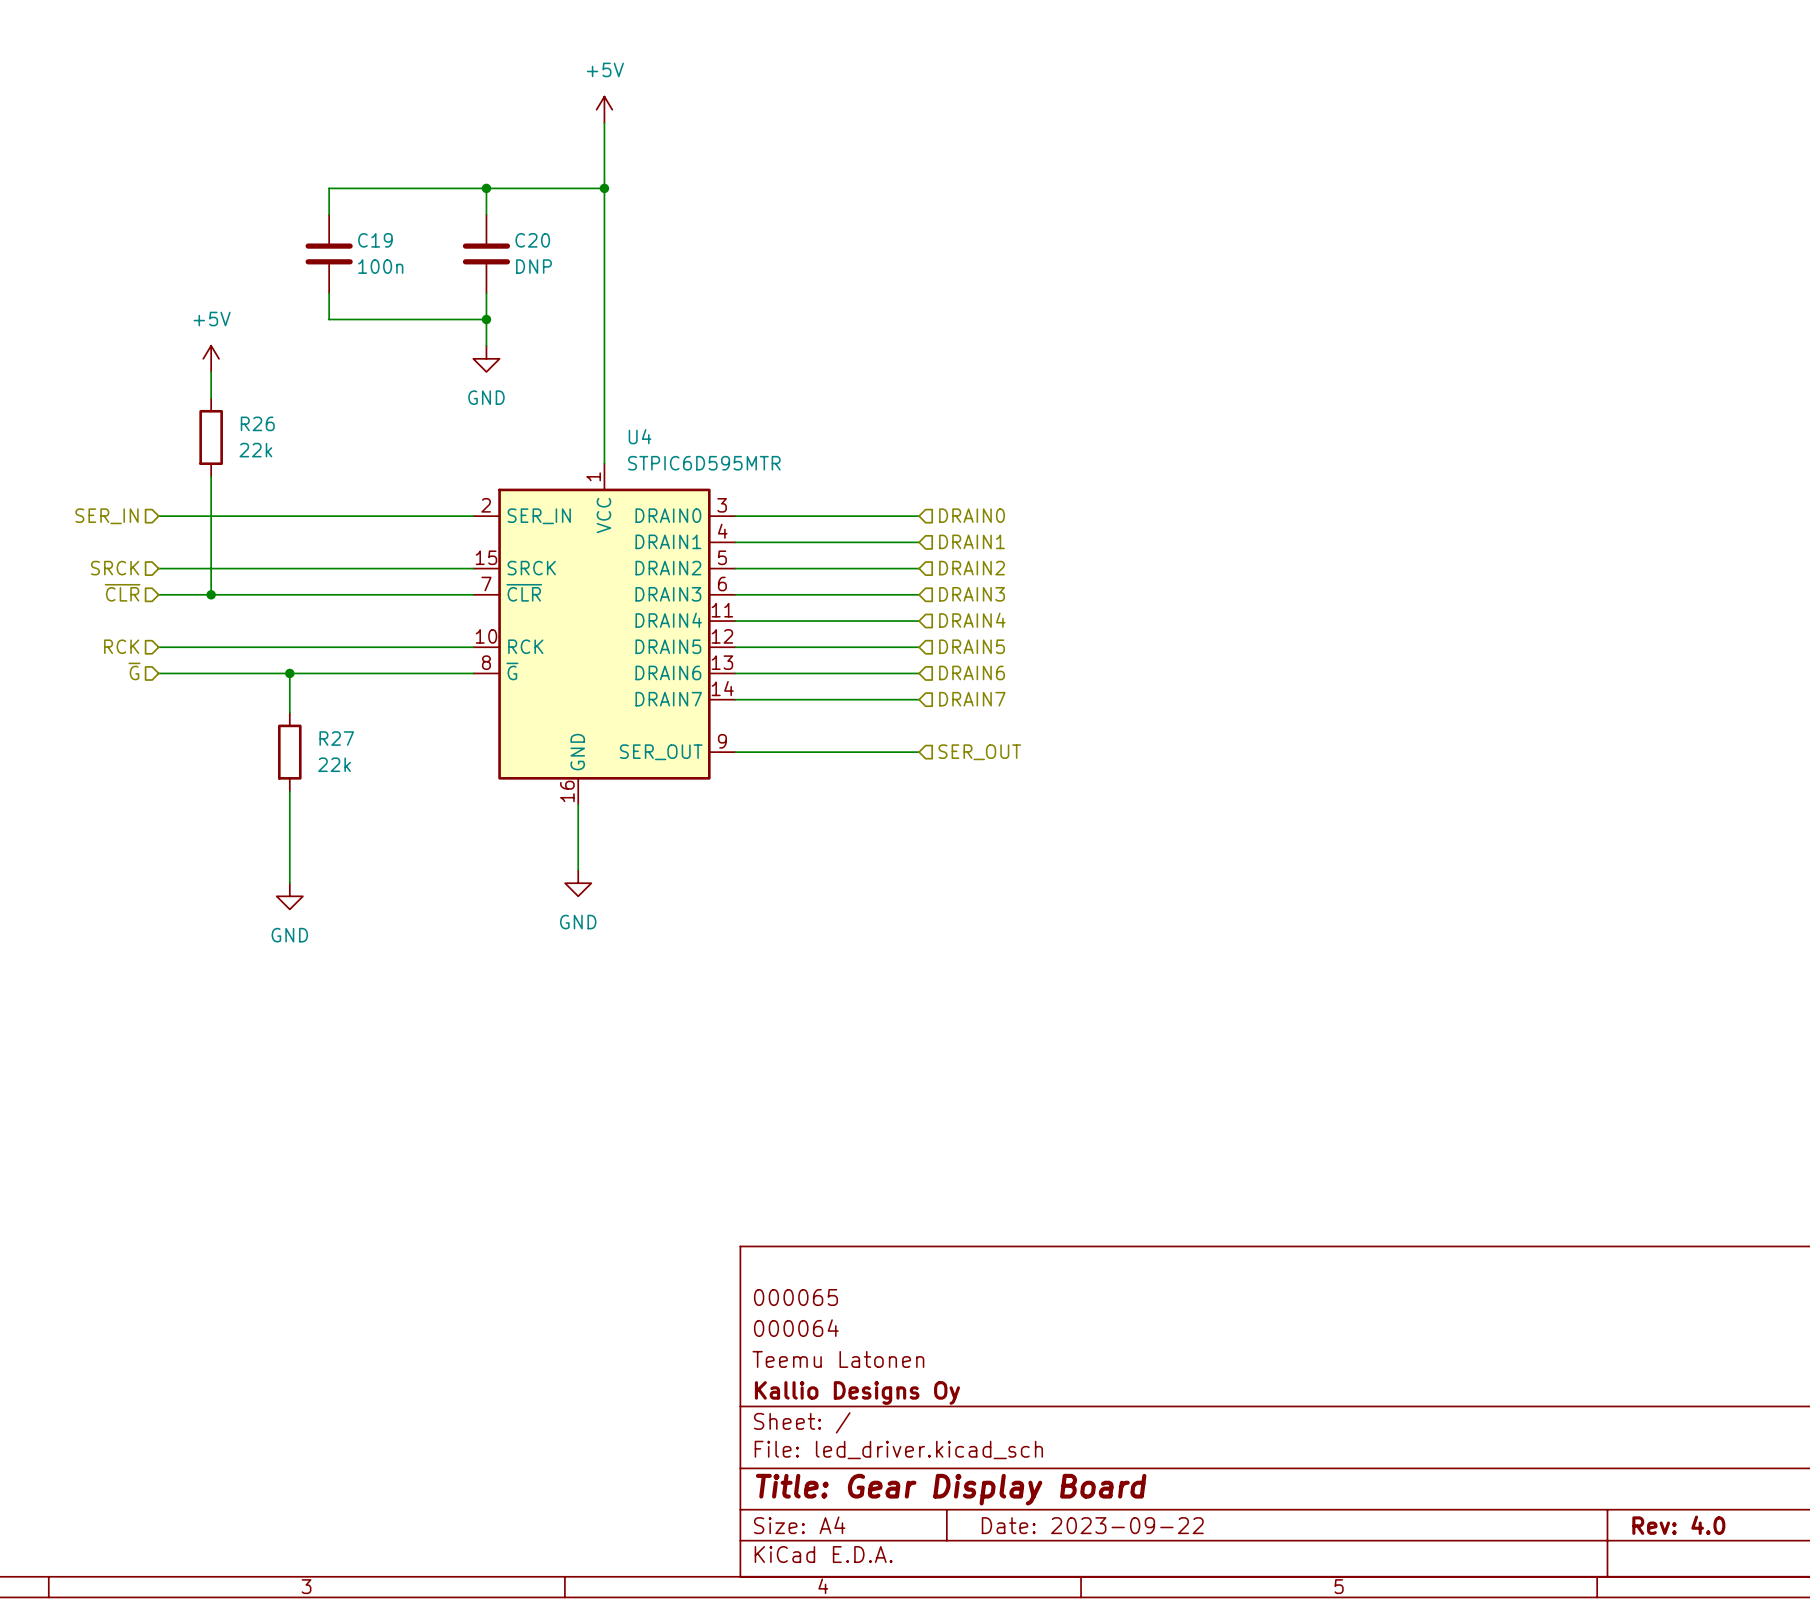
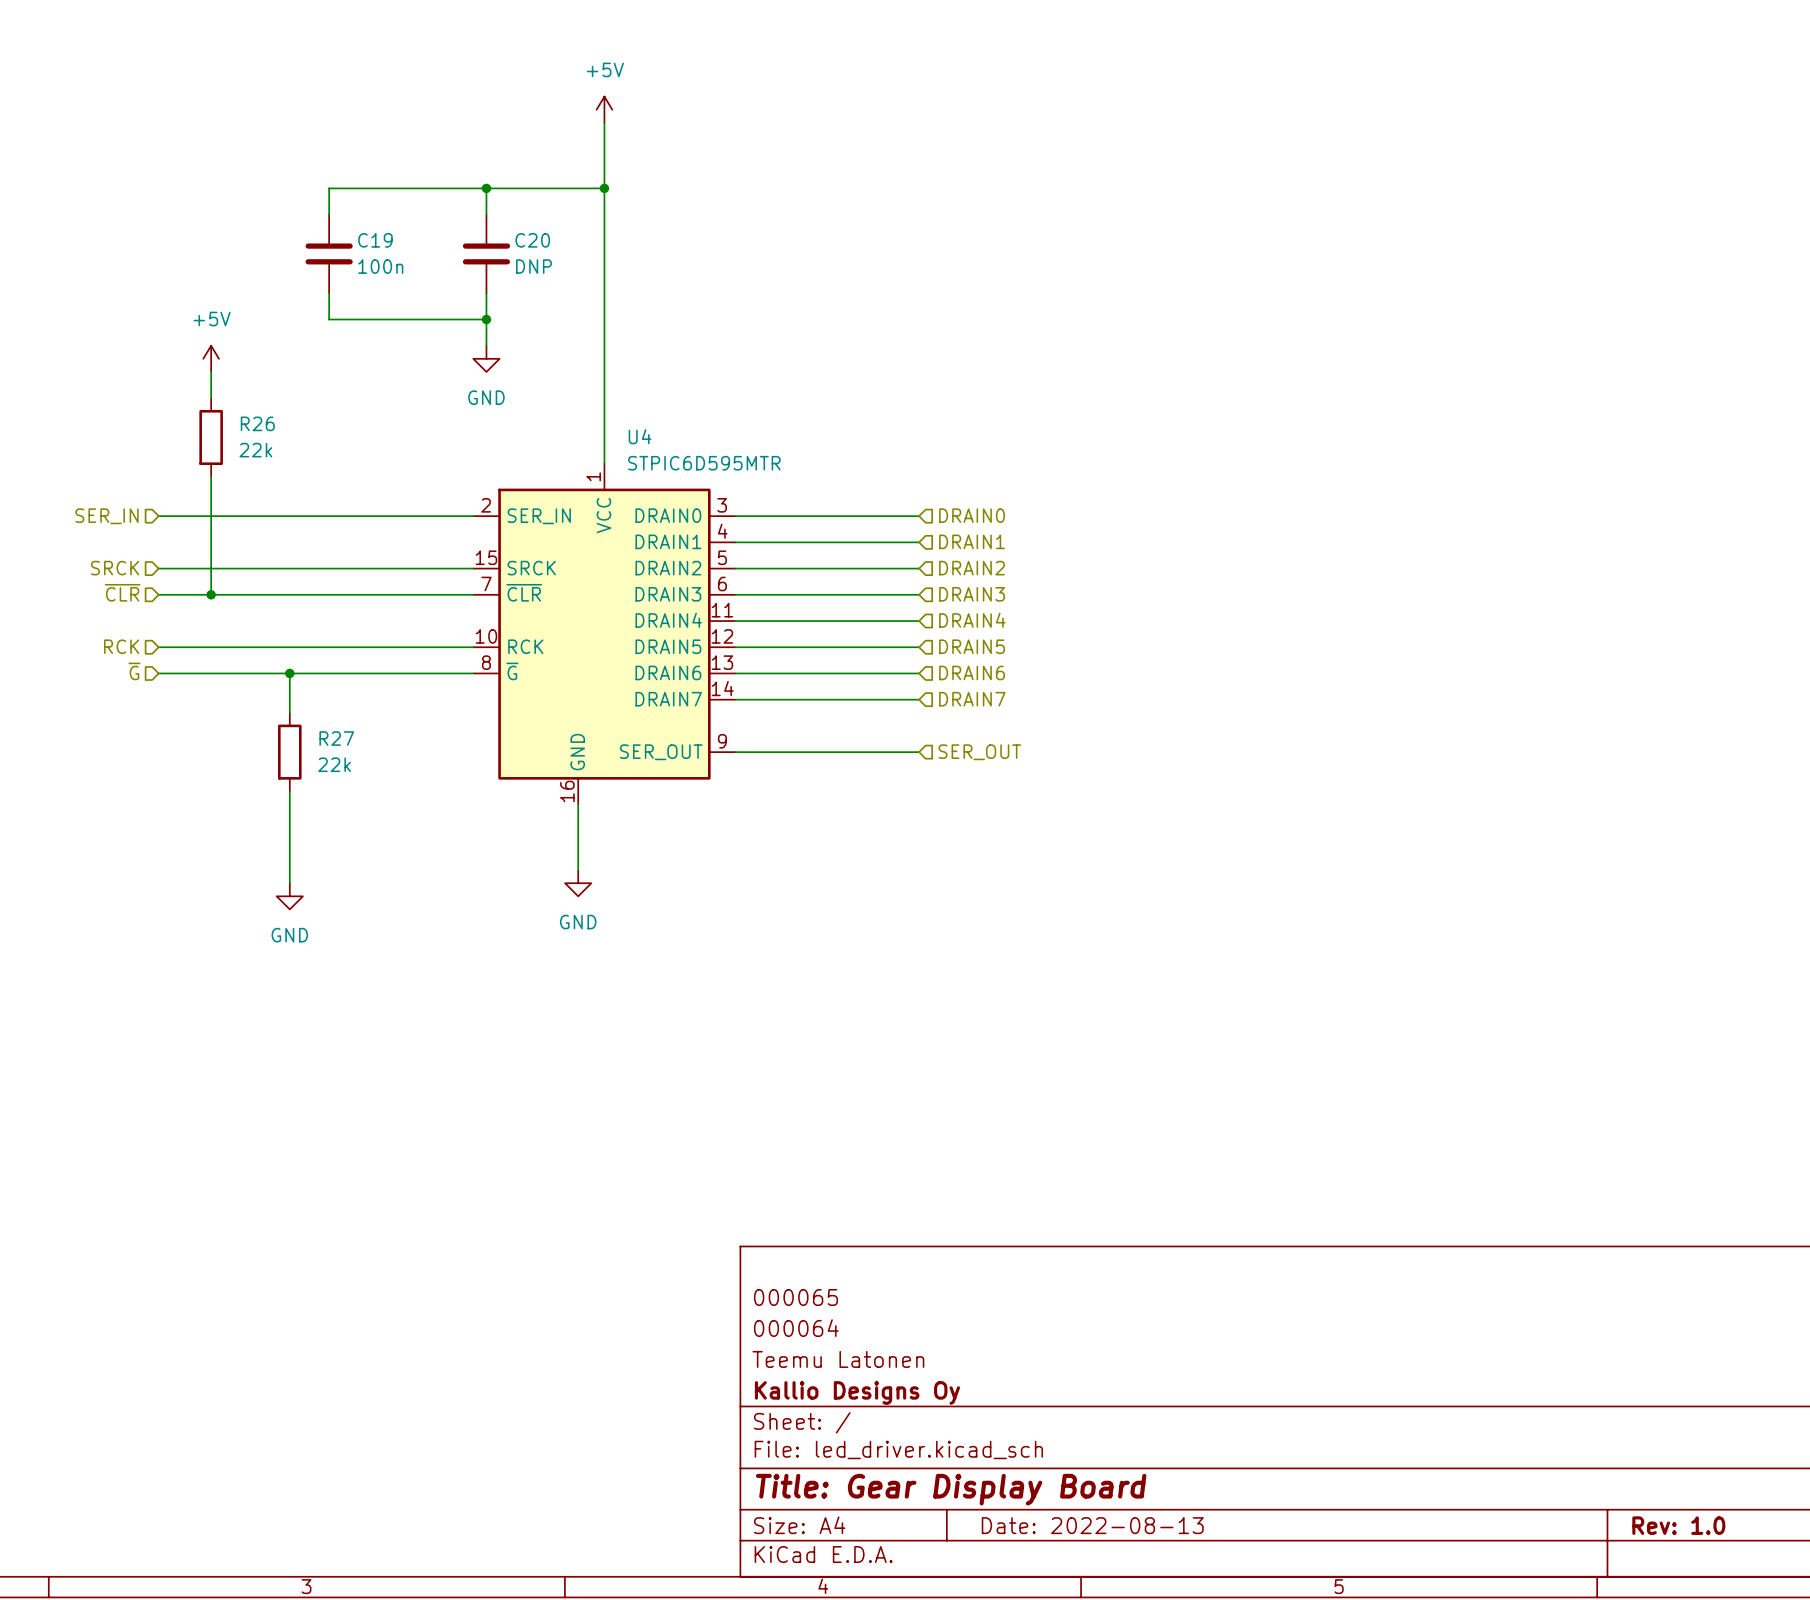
title block: Date: 2023-09-22 (1092, 1525) -> Date: 2022-08-13 (1092, 1525)
title block: Rev: 4.0 (1678, 1525) -> Rev: 1.0 (1678, 1525)

